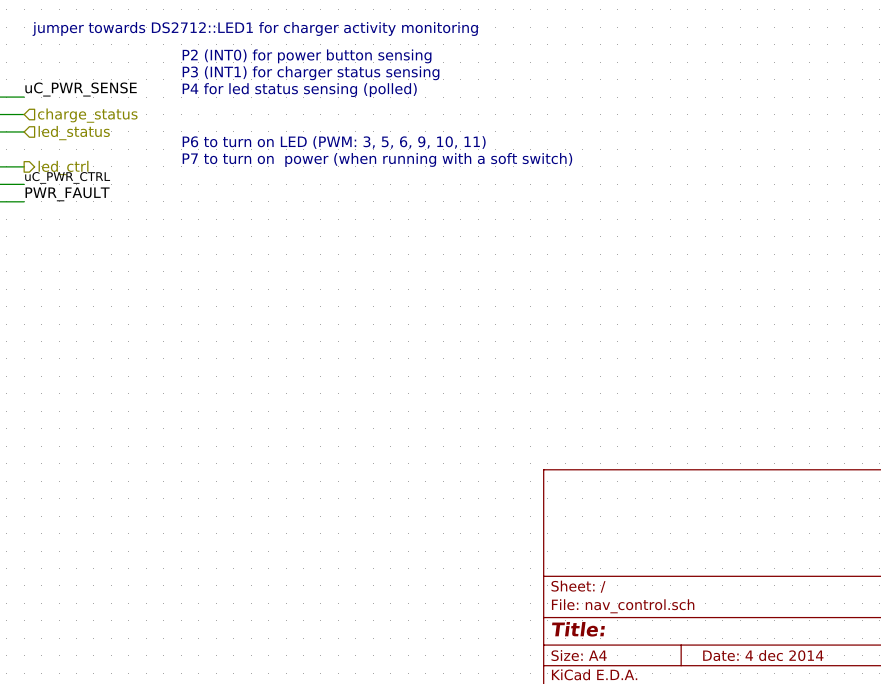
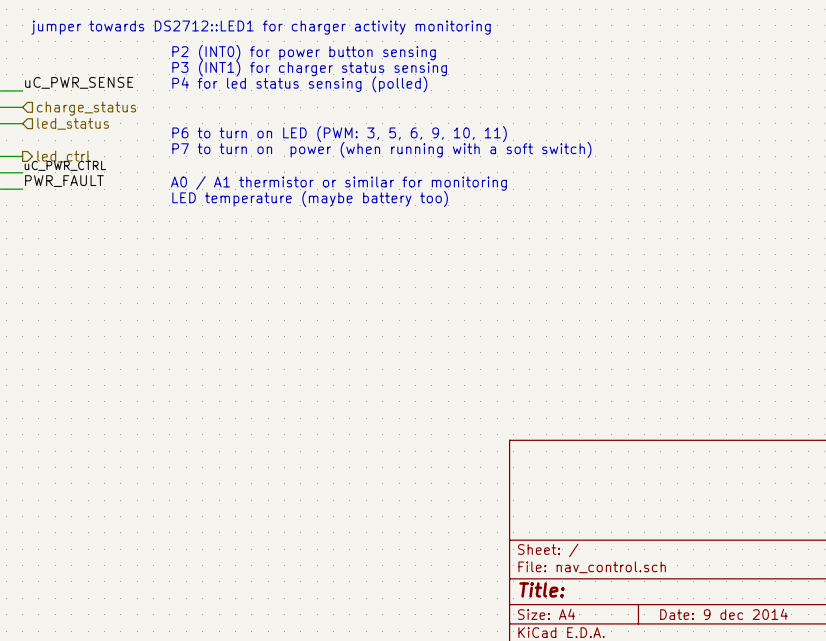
text: none -> A0 / A1 thermistor or similar for monitoring (338, 183)
text: none -> LED temperature (maybe battery too) (310, 198)
title block: Date: 4 dec 2014 (763, 655) -> Date: 9 dec 2014 (723, 614)

